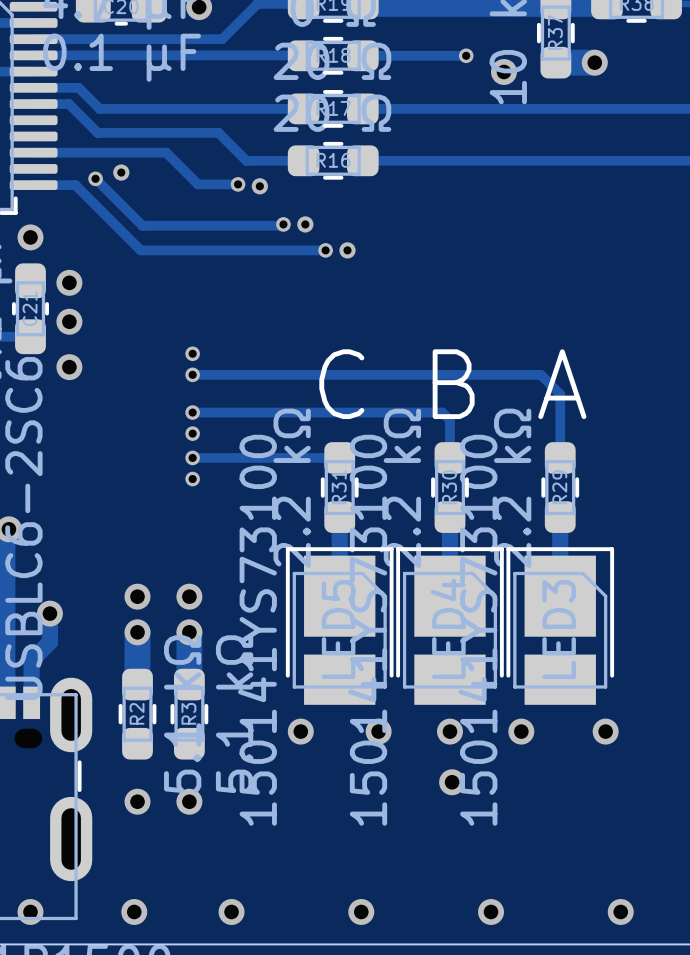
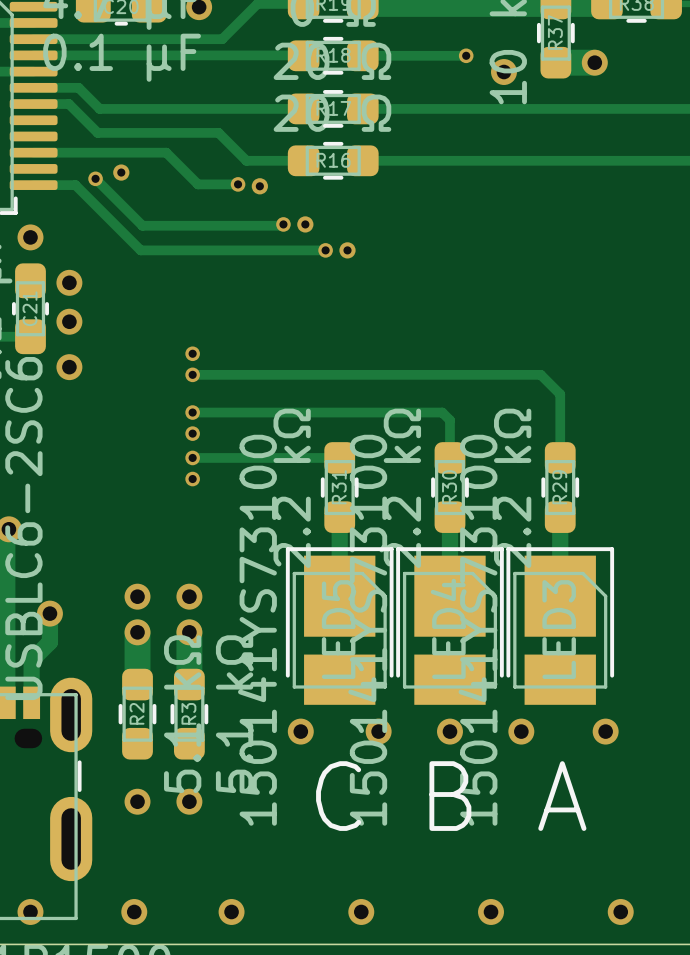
text position: C (341, 384) -> C (338, 796)
text position: B (453, 384) -> B (450, 796)
text position: A (562, 384) -> A (562, 796)
via: (452, 782) -> none

